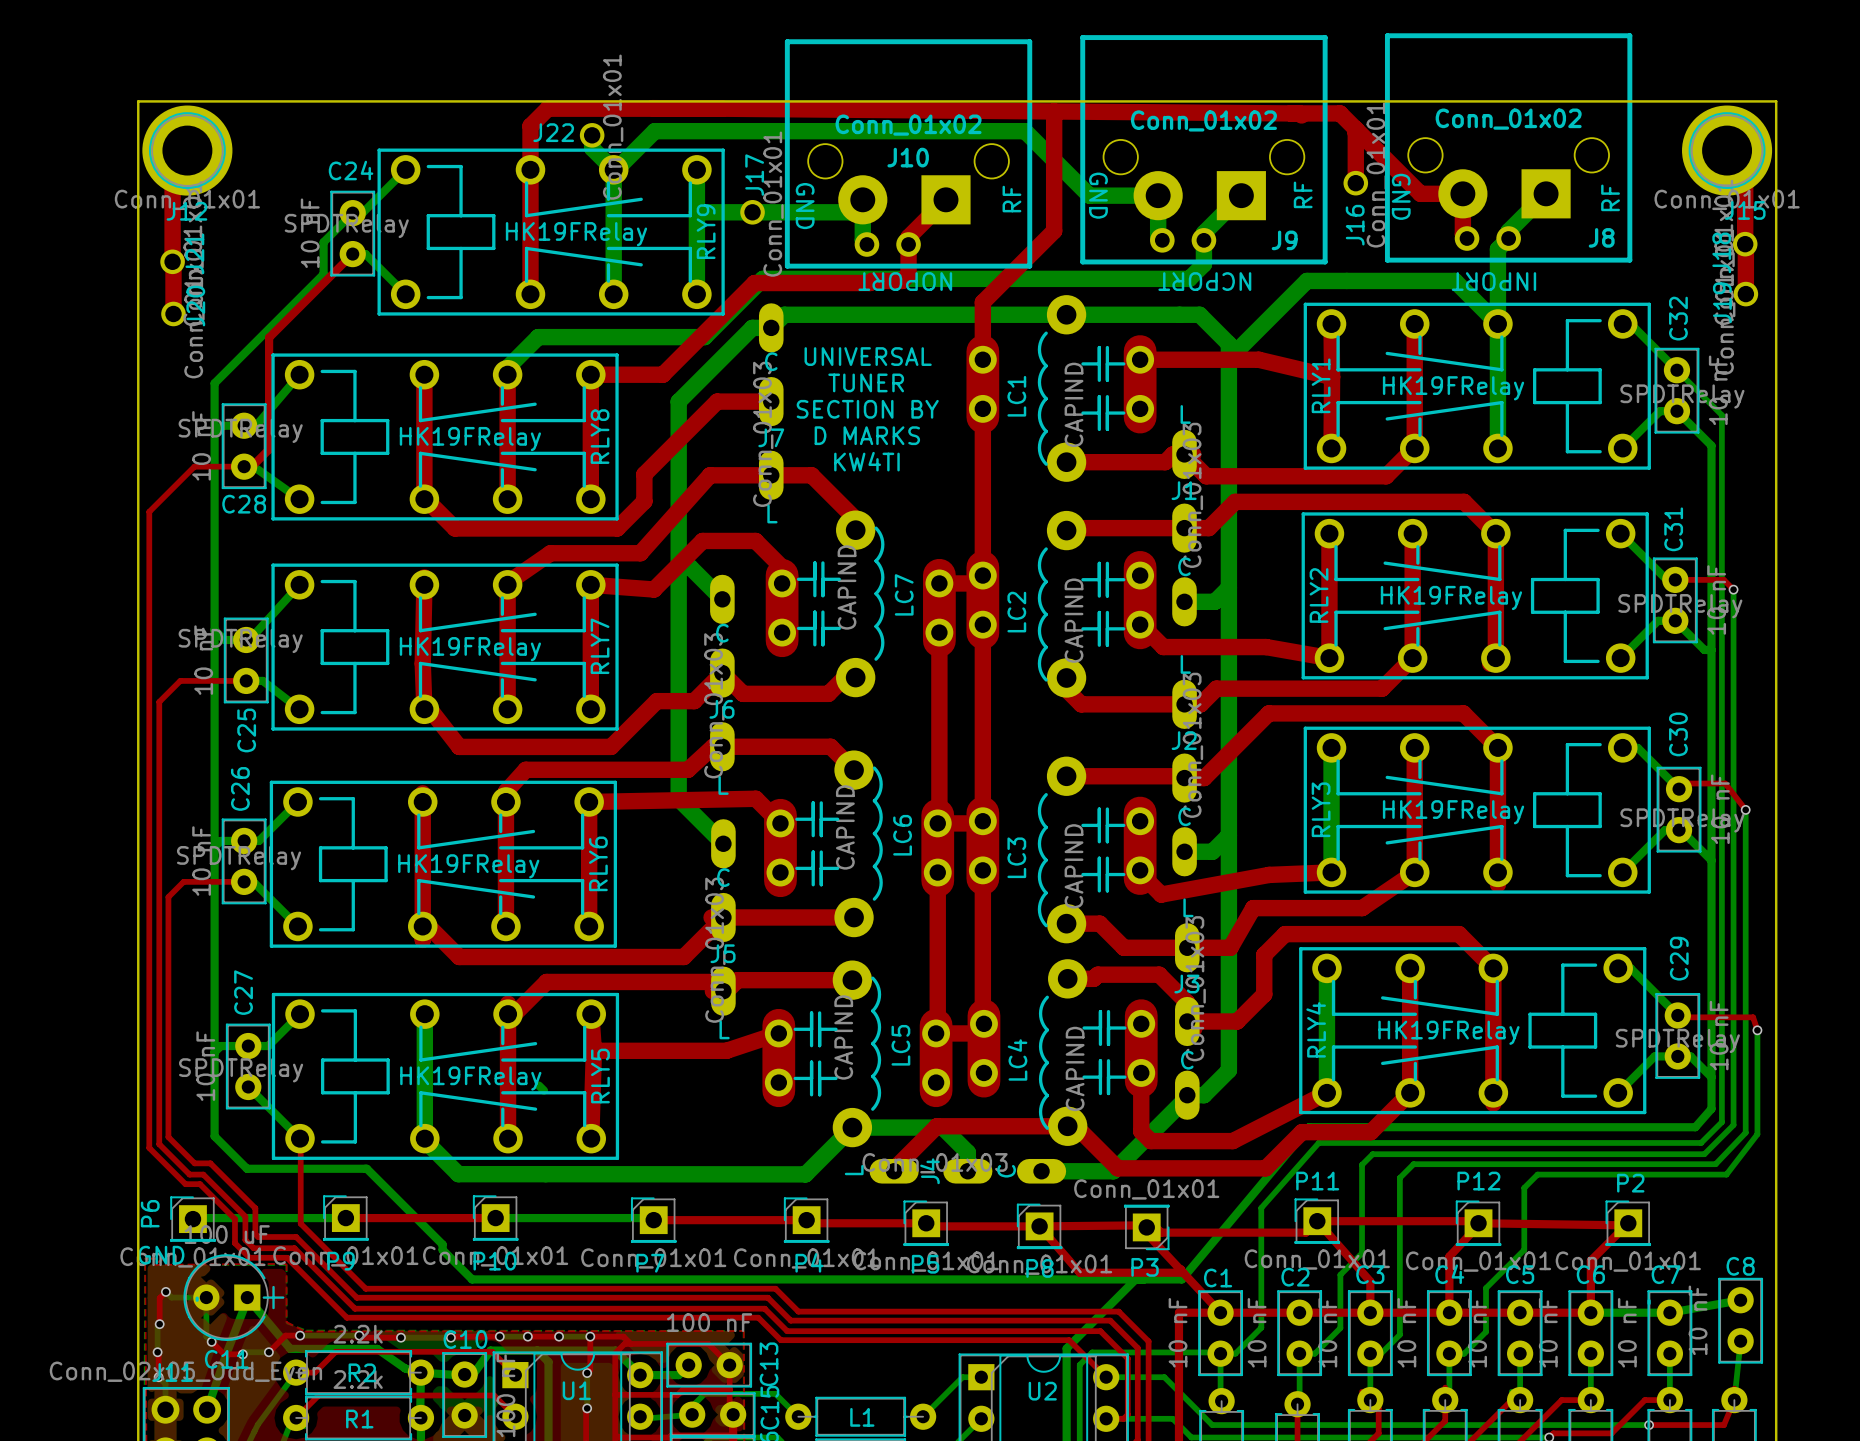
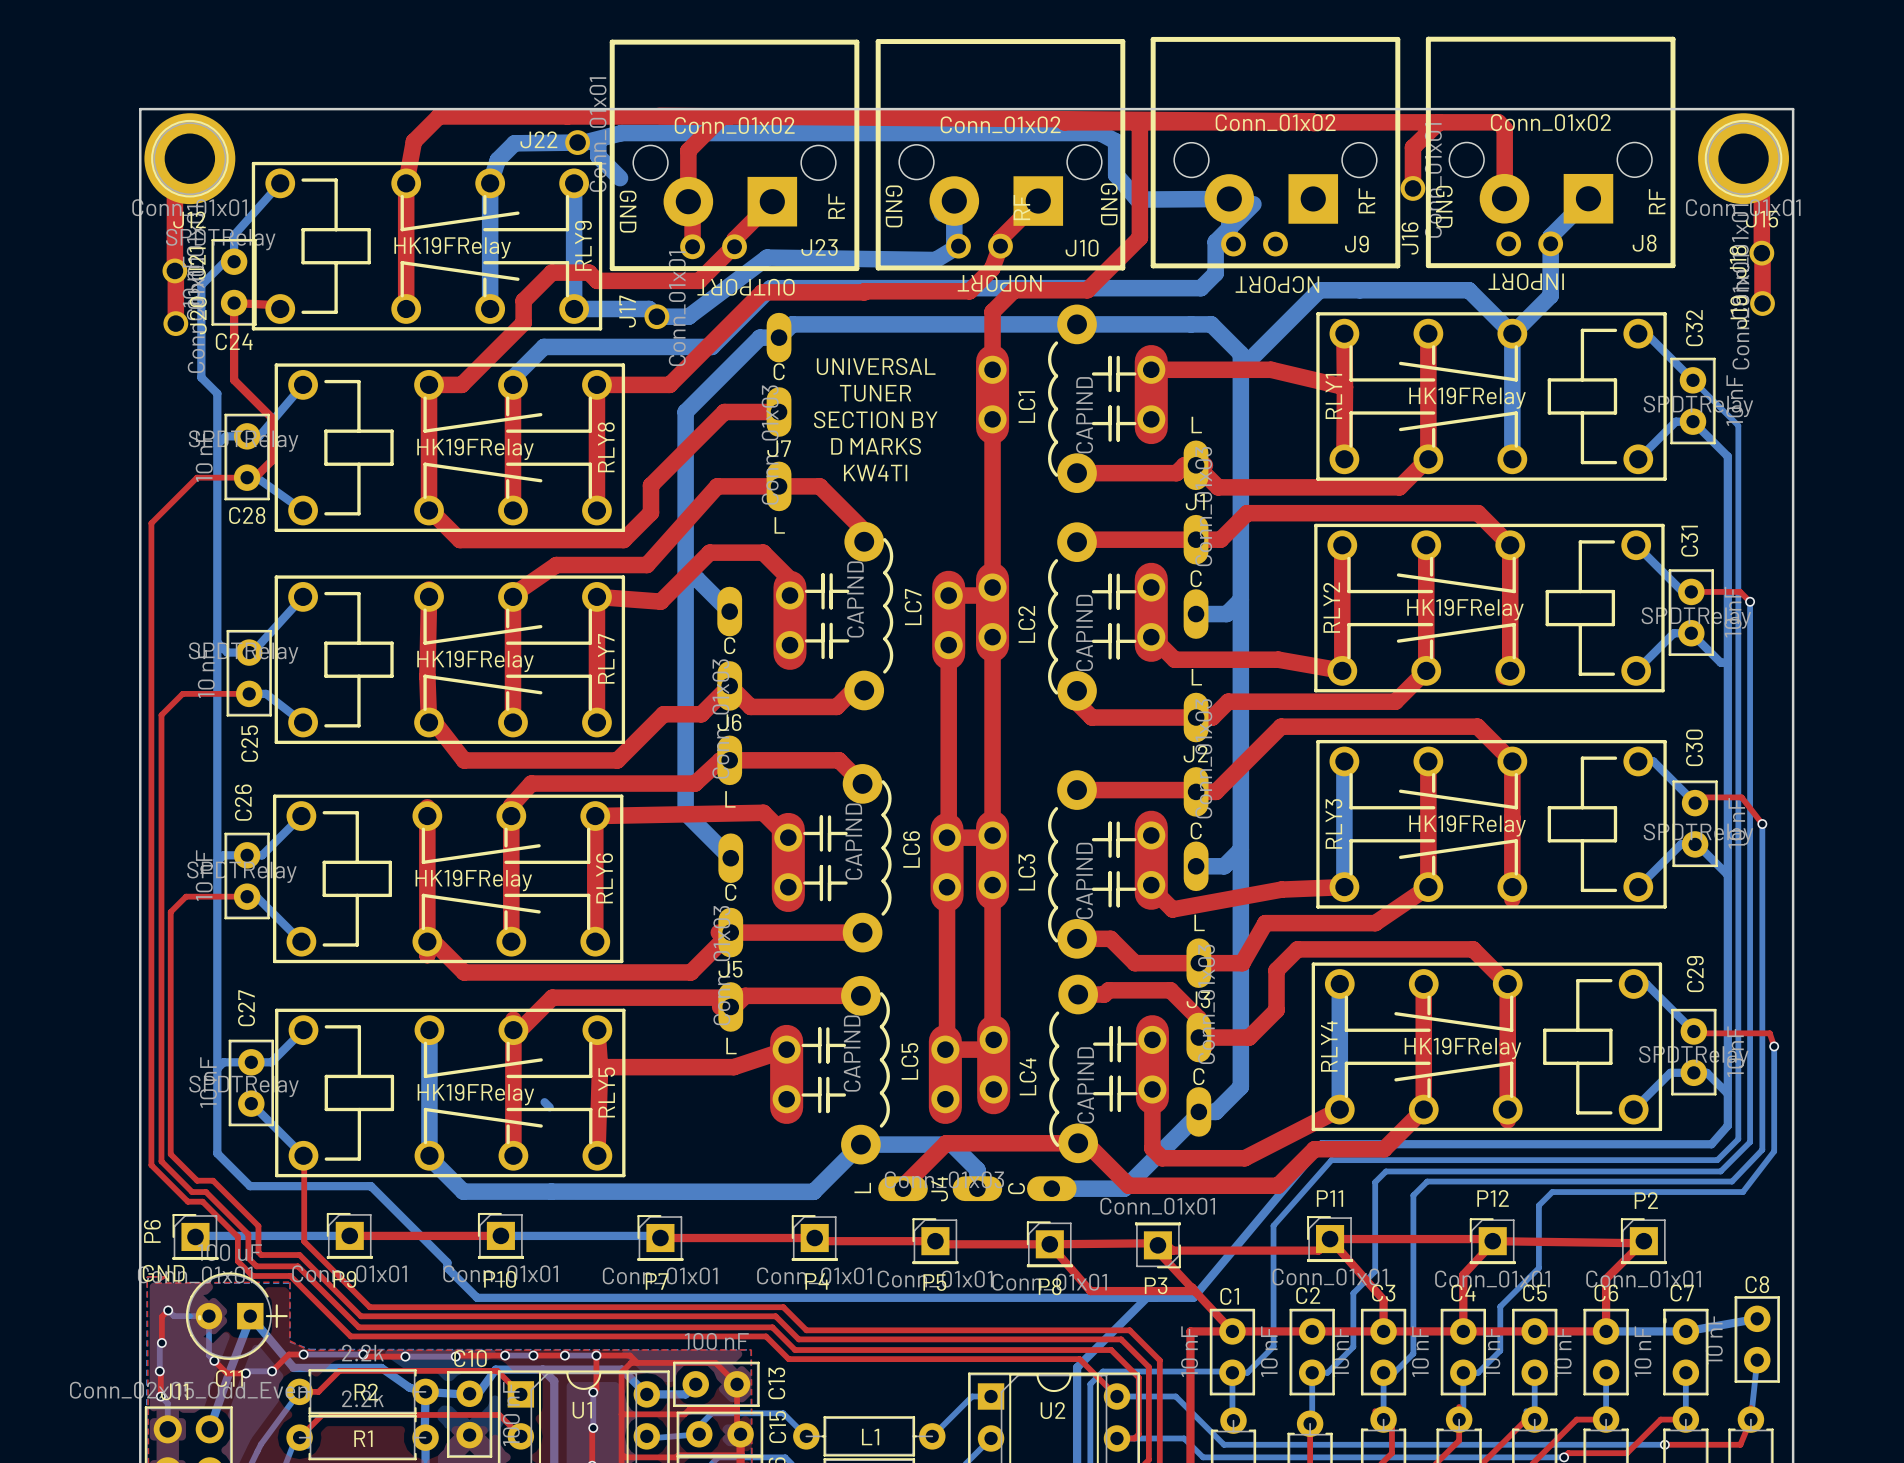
top track: (547, 108) (530, 126) (530, 294) -> (553, 116) (438, 116) (413, 141) (406, 183) (406, 308)
top track: none -> (722, 116) (688, 150) (688, 201) (692, 205) (692, 246)
top track: (1290, 113) (1340, 113) (1420, 193) (1462, 193) (1462, 234) (1467, 238) -> none
top track: (1054, 114) (1054, 231) (1004, 280) -> (1139, 122) (1139, 237) (1087, 290) (1014, 290)
top track: none -> (1064, 122) (1498, 122) (1504, 128) (1504, 198)
top track: none -> (1439, 122) (1412, 147) (1412, 188)
top track: (1355, 129) (1355, 183) -> none
J22 position: (592, 135) -> (577, 142)
J23: none -> Conn_01x02 (734, 155)
J8 position: (1508, 147) -> (1550, 152)
J9 position: (1203, 149) -> (1275, 152)
J10 position: (908, 153) -> (1000, 154)
J10 name position: J10 (908, 157) -> J10 (1082, 248)
bottom track: (405, 169) (362, 213) (352, 213) (323, 242) (323, 274) (214, 383) -> (280, 183) (234, 235) (234, 261) (224, 261) (201, 285) (201, 377) (217, 393)
bottom track: (696, 169) (696, 294) -> none
C24 name position: C24 (351, 170) -> C24 (234, 341)
bottom track: none -> (574, 183) (574, 308) (649, 308) (656, 316) (688, 316) (767, 257) (935, 260) (958, 246) (954, 241) (954, 201) (941, 213)
J17 name position: J17 (754, 175) -> J17 (627, 311)
J16 position: (1355, 183) -> (1412, 188)
top track: none -> (772, 201) (734, 239) (734, 246) (699, 280) (597, 280) (589, 272) (551, 272) (523, 300) (523, 323) (461, 384) (429, 384)
bottom track: (1546, 193) (1508, 231) (1508, 238) (1497, 249) (1497, 323) -> (1588, 198) (1550, 236) (1550, 295) (1512, 333)
text position: RF (1303, 194) -> RF (1366, 200)
text position: GND (1401, 196) -> GND (1444, 206)
text: none -> RF (836, 206)
text position: RF (1610, 197) -> RF (1657, 201)
top track: (945, 199) (908, 237) (908, 274) (902, 280) (855, 283) -> (1038, 201) (1000, 238) (1000, 246) (992, 268) (969, 291) (864, 292)
text: none -> GND (628, 211)
text position: GND (805, 206) -> GND (894, 206)
bottom track: (696, 212) (850, 212) (862, 199) (862, 240) (866, 244) -> none
J17 position: (752, 212) -> (656, 316)
J16 name position: J16 (1355, 225) -> J16 (1410, 238)
RLY9 position: (551, 232) -> (427, 246)
C24 position: (352, 233) -> (234, 282)
bottom track: none -> (1233, 244) (1229, 239) (1229, 198) (1137, 199) (1116, 175) (1116, 141) (1100, 133) (621, 133) (584, 142) (514, 143) (497, 159) (490, 183) (490, 308)
bottom track: (1162, 240) (1158, 236) (1158, 195) (1089, 195) (1025, 131) (654, 131) (616, 169) (613, 169) (613, 294) -> none
bottom track: (352, 254) (365, 254) (405, 294) -> none
top track: (352, 254) (269, 337) (269, 407) -> (280, 308) (276, 305) (234, 303) (234, 380) (272, 418)
text: none -> OUTPORT (746, 287)
text position: NOPORT (905, 281) -> NOPORT (999, 283)
text position: NCPORT (1204, 281) -> NCPORT (1277, 284)
text position: INPORT (1493, 281) -> INPORT (1526, 281)

